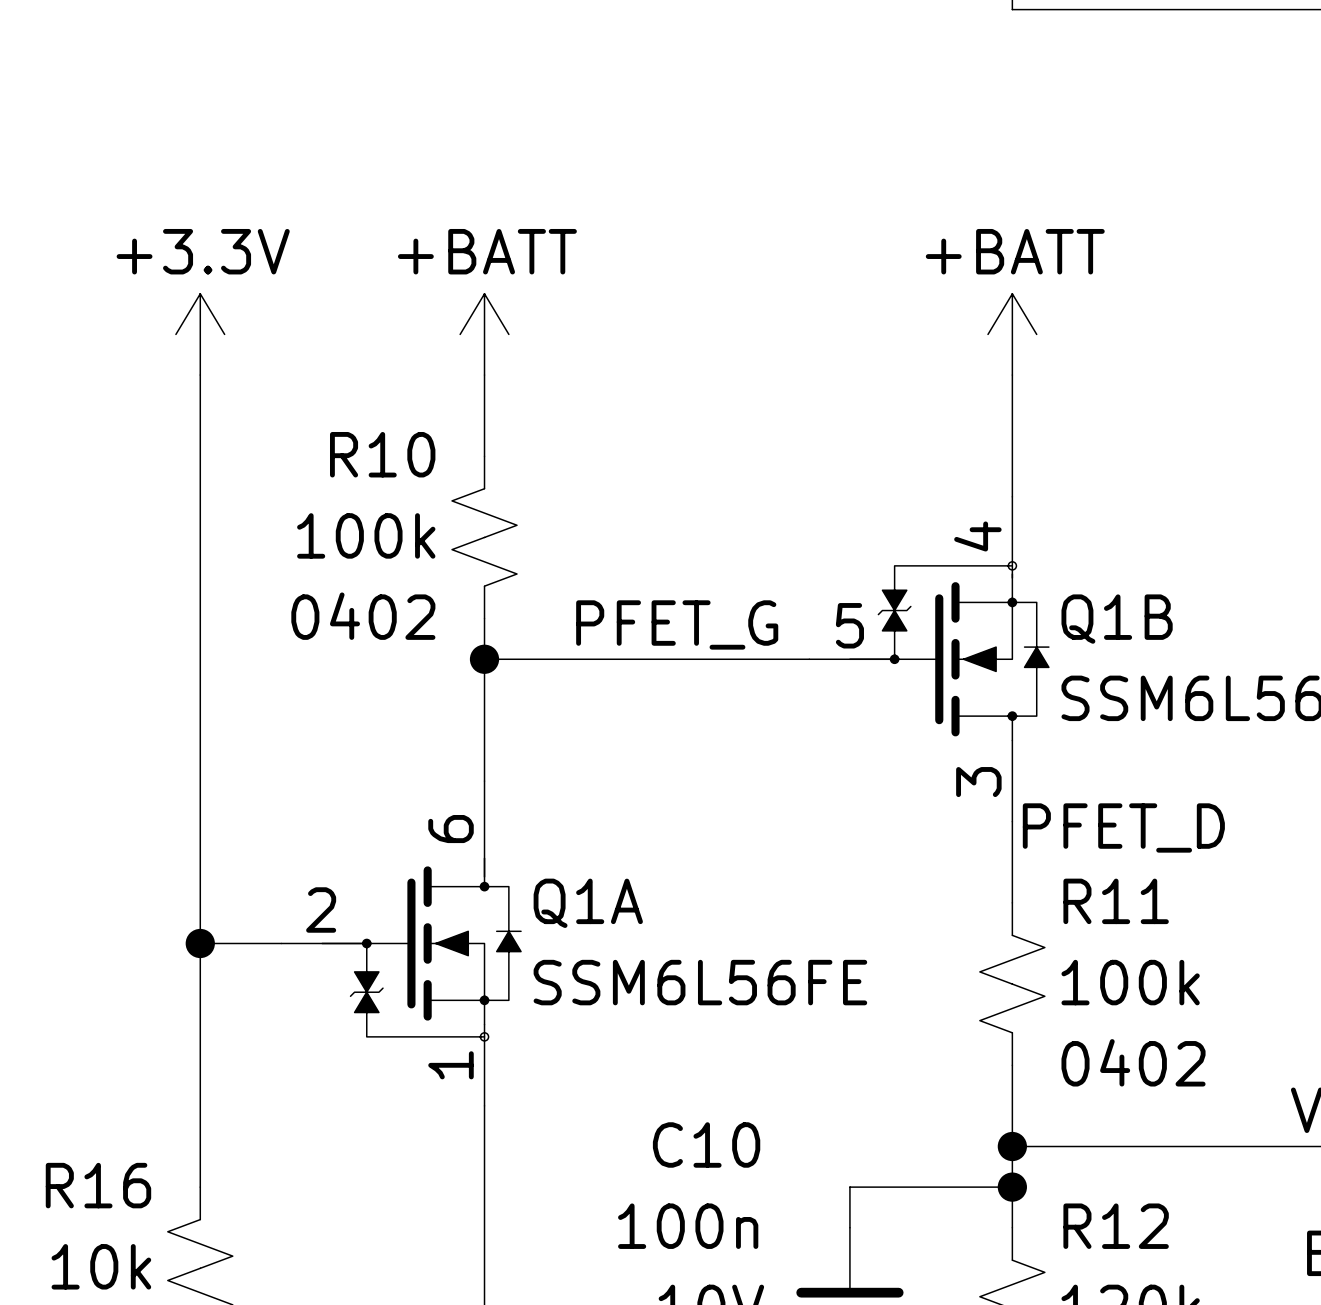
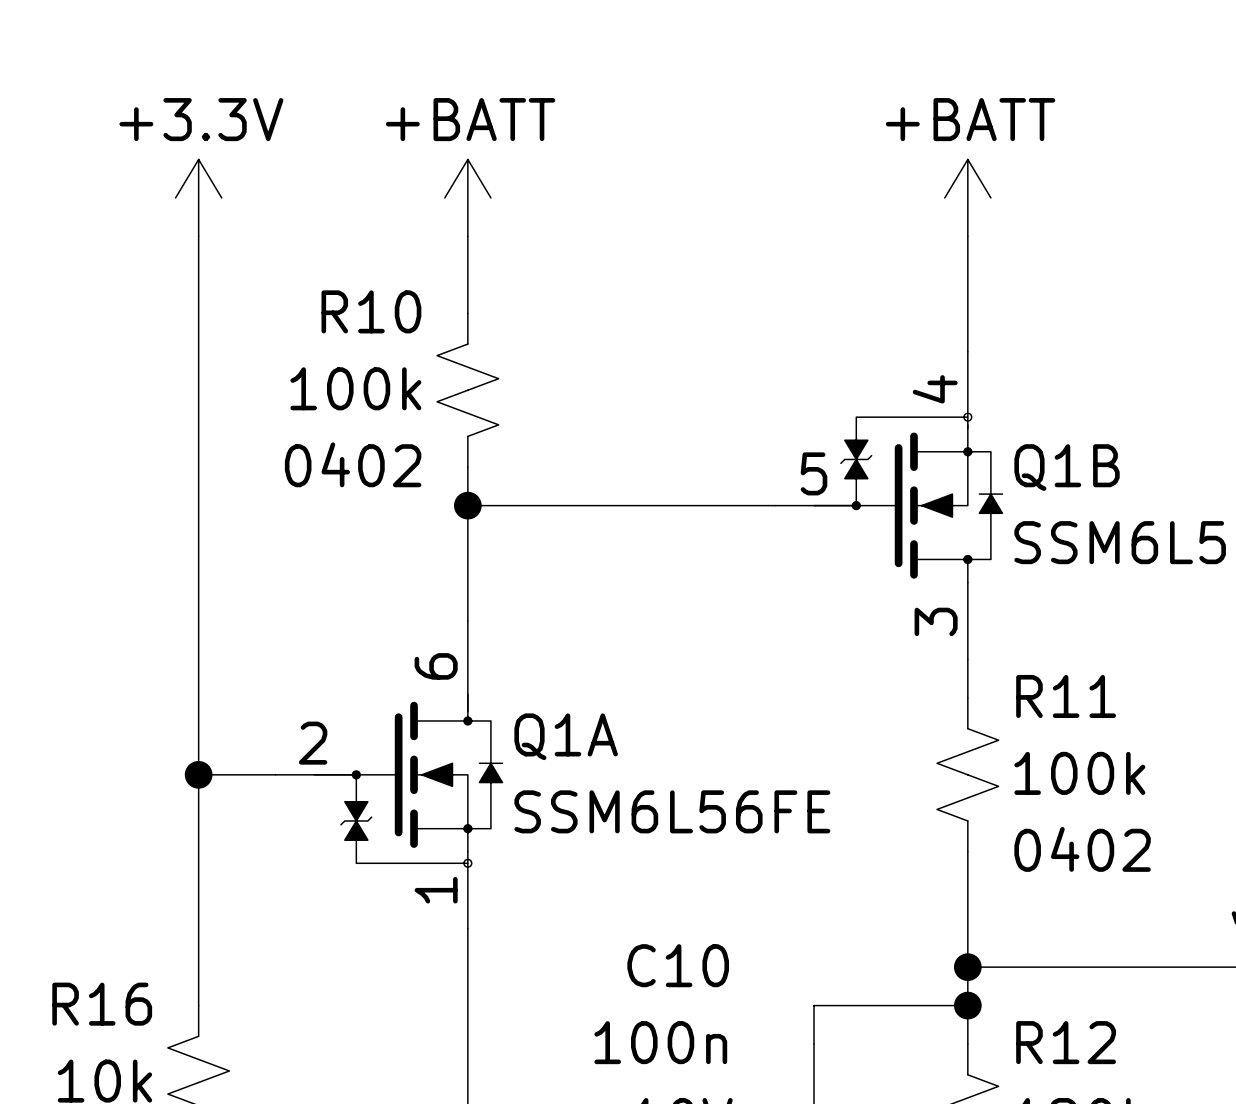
label: PFET_G (677, 624) -> none
label: PFET_D (1123, 827) -> none
R11 position: (1012, 984) -> (967, 774)

